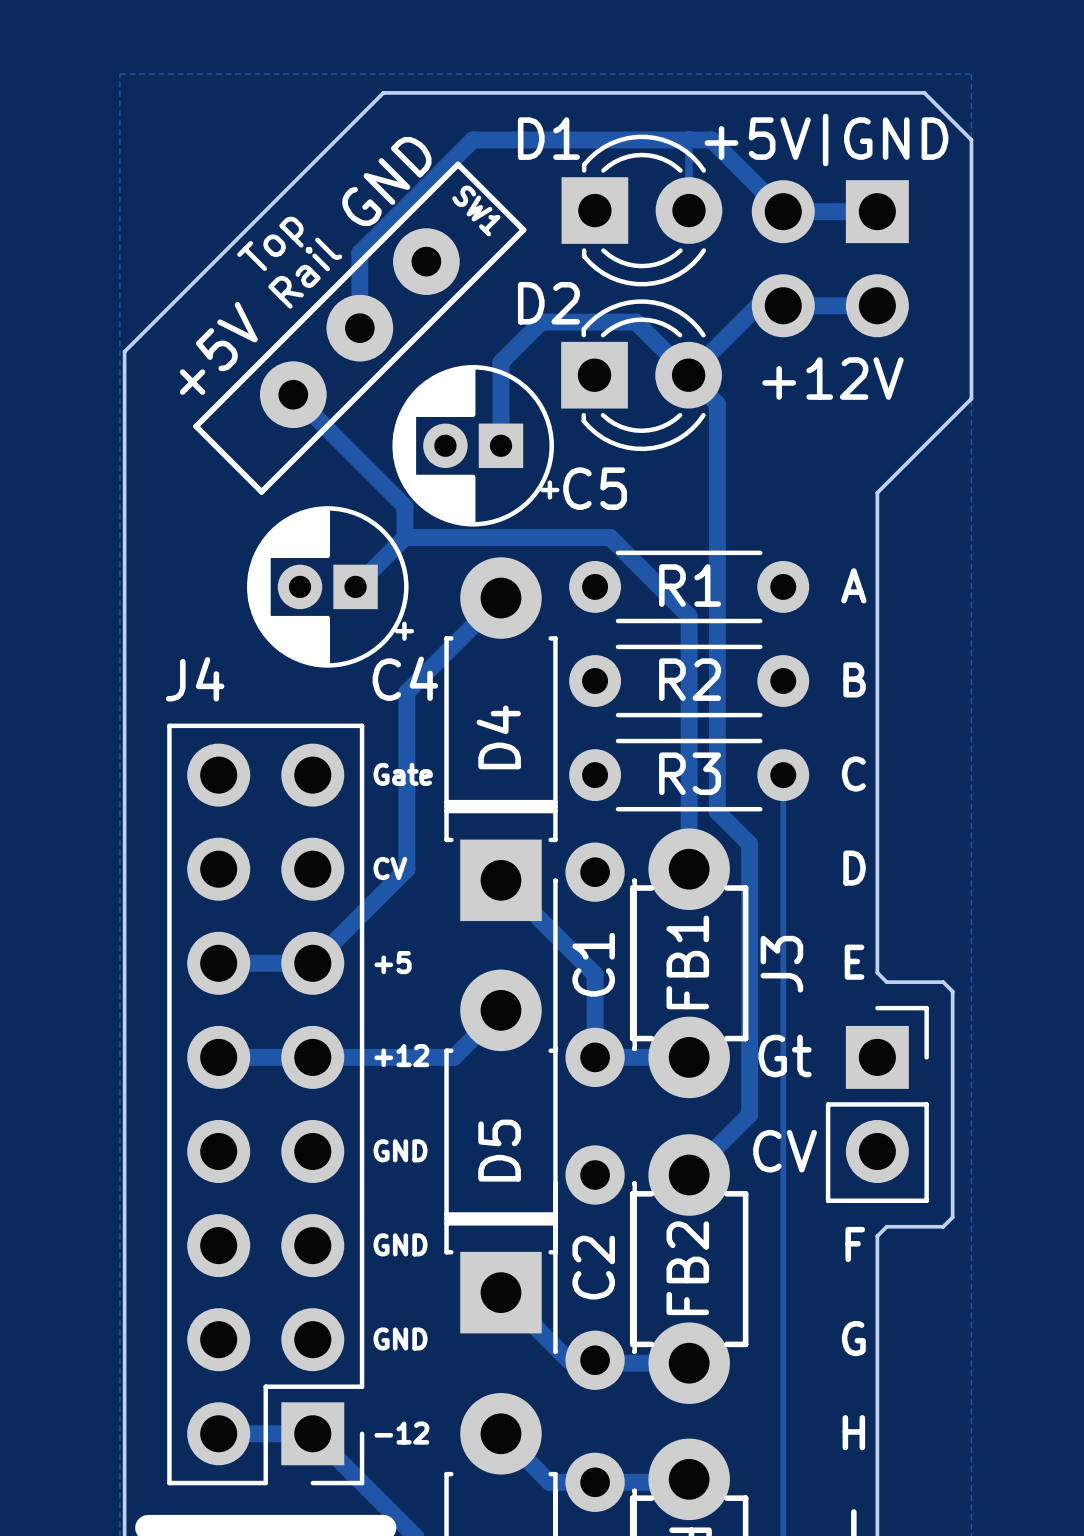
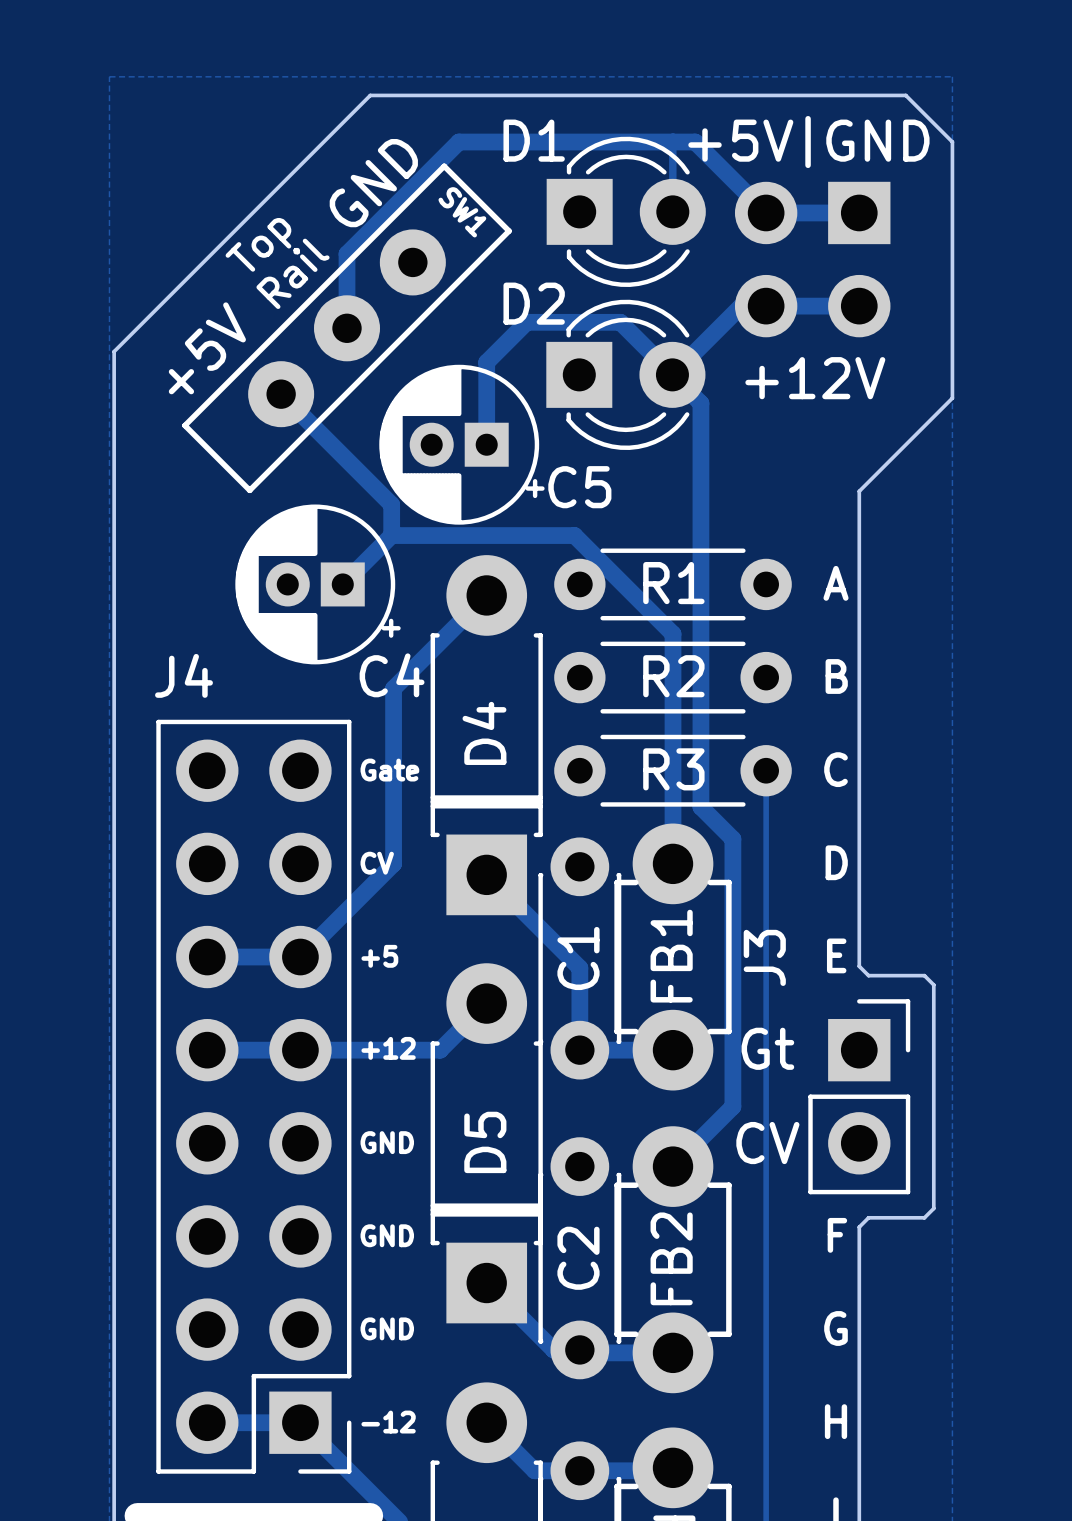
track: (589, 537) (610, 537) (689, 616) (689, 636) -> (574, 535) (673, 633)

